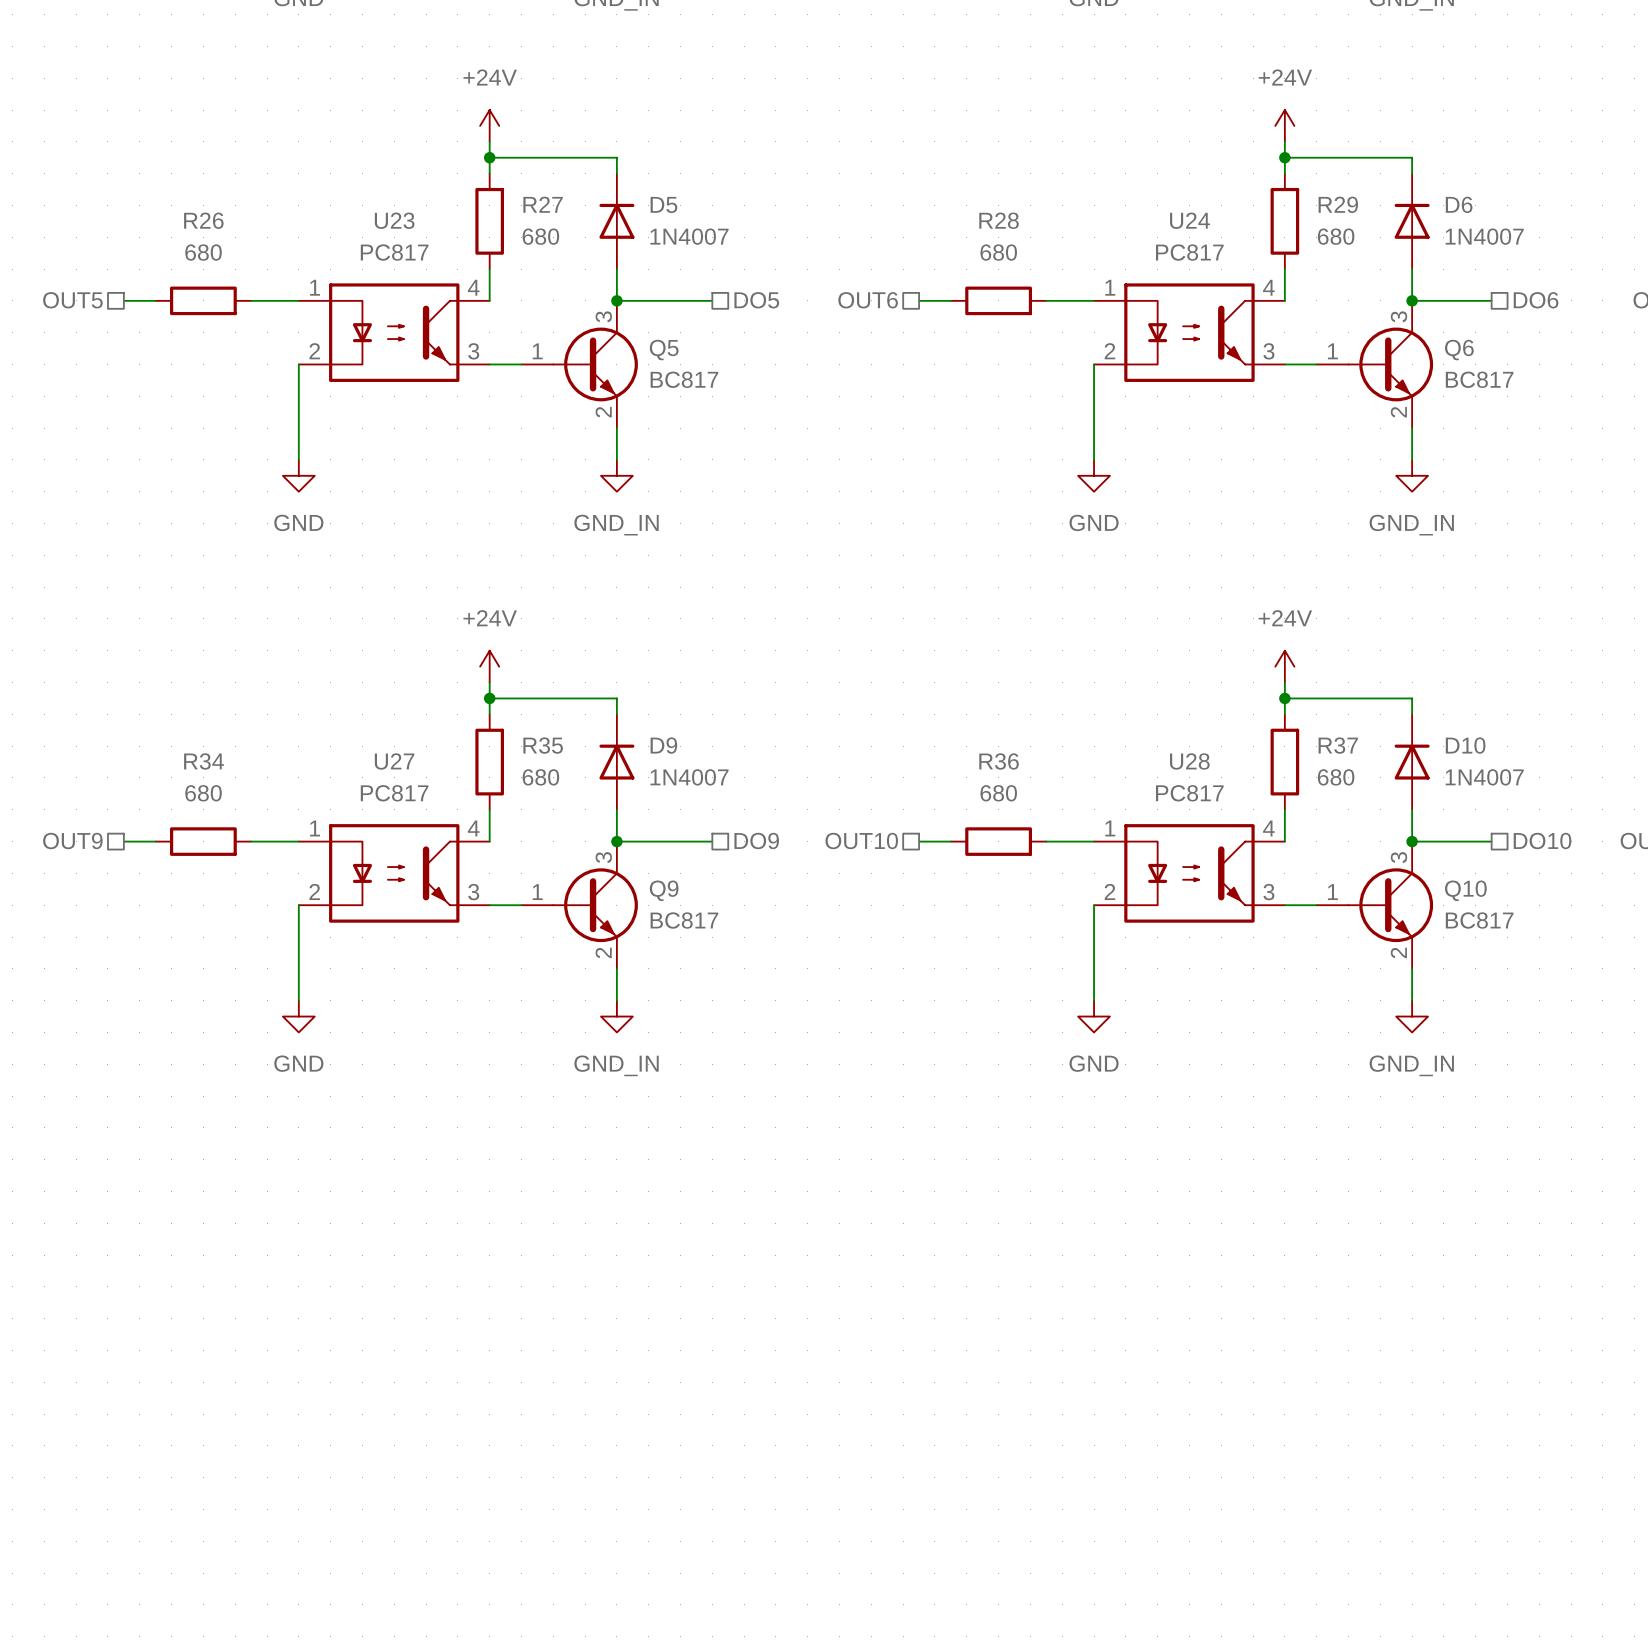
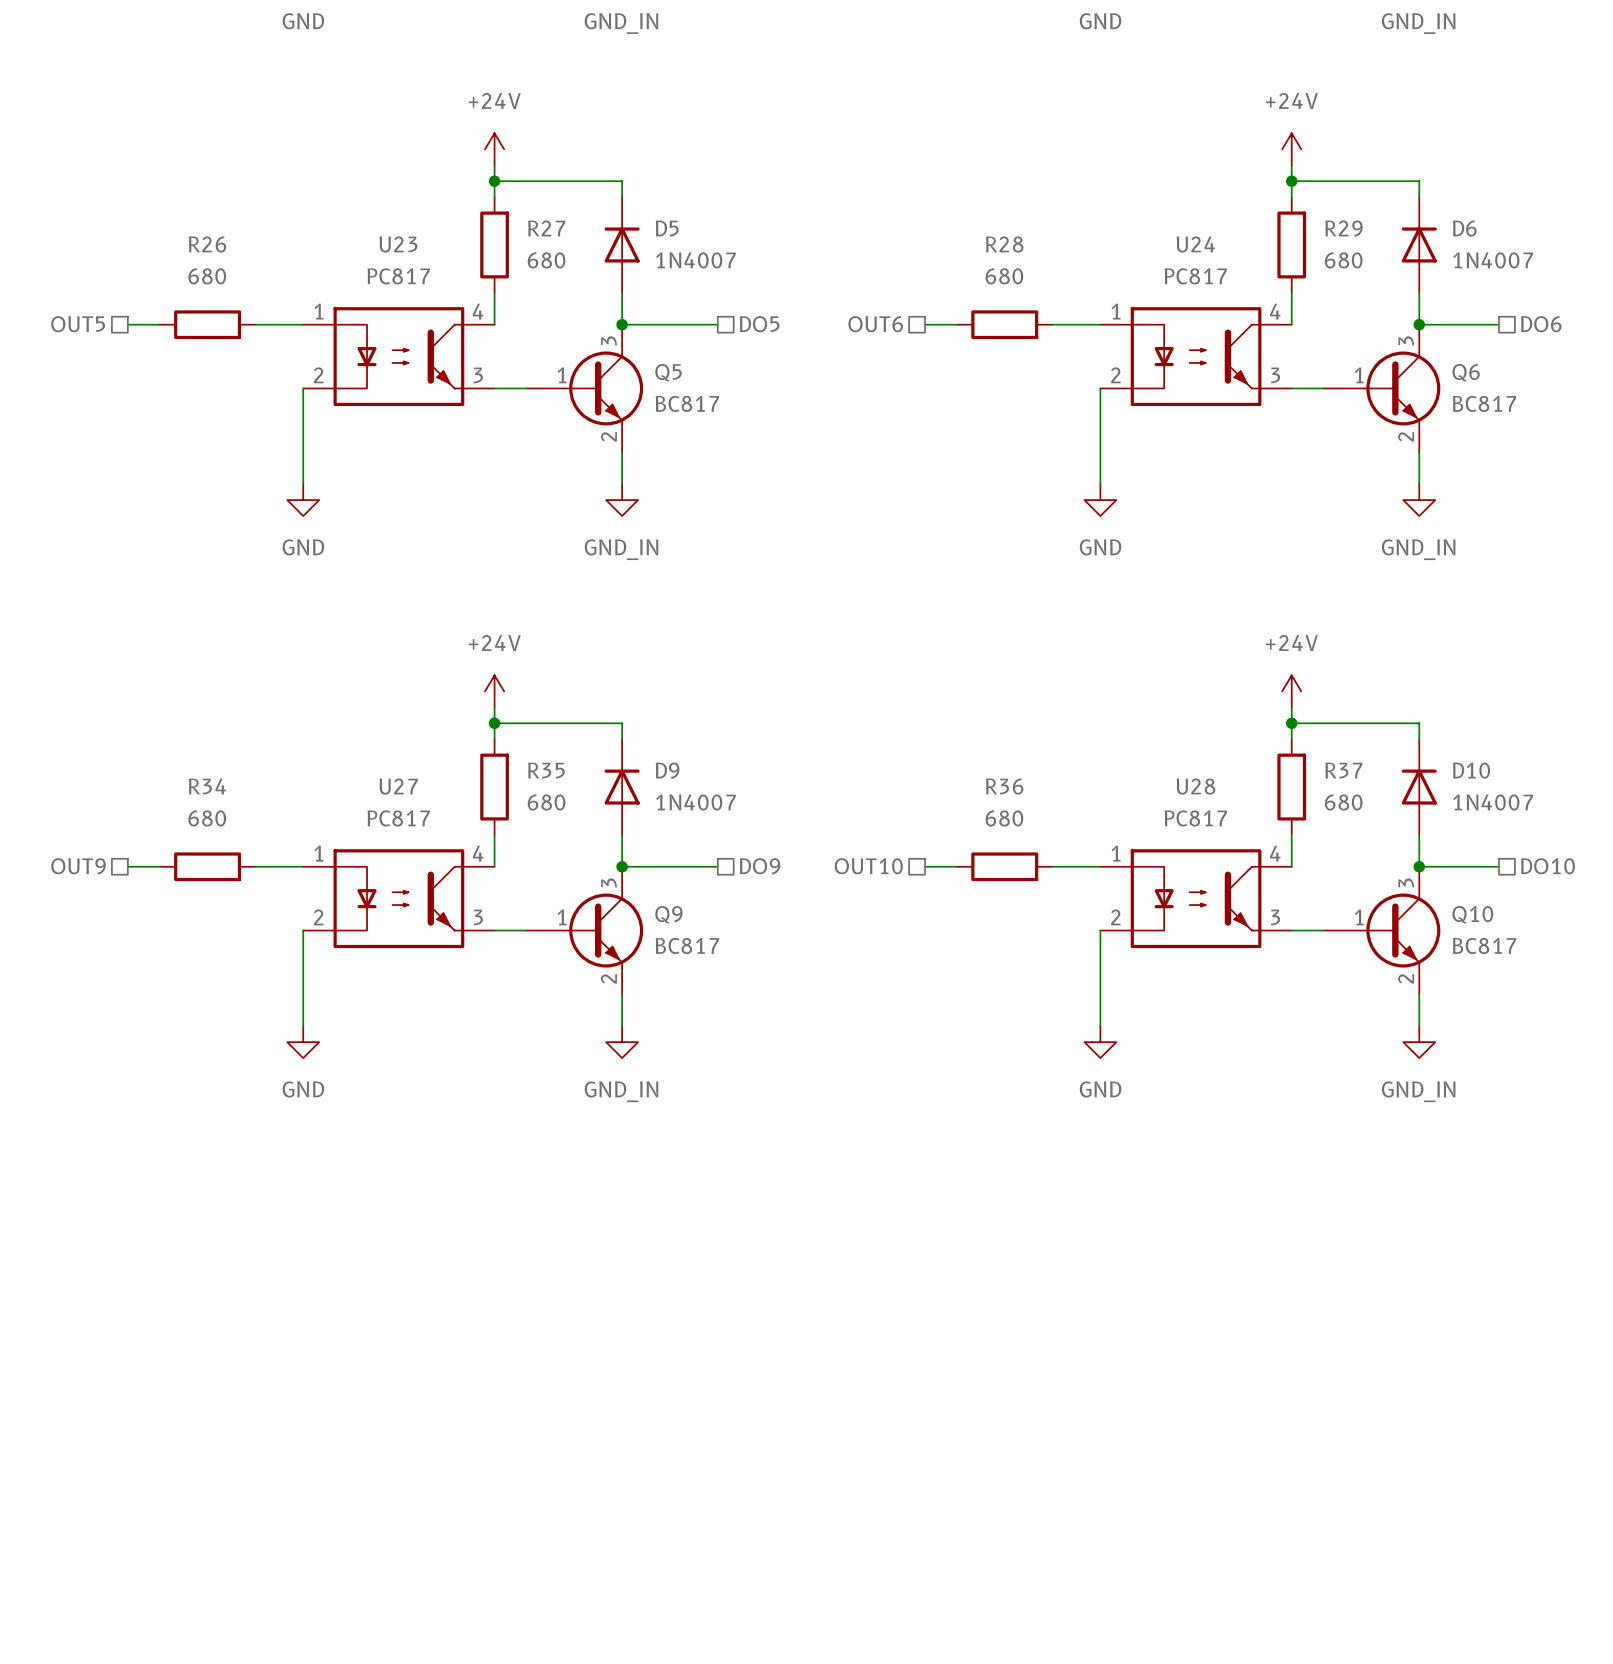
Q5 symbol: [521, 300, 638, 429] -> [526, 324, 644, 453]
Q6 symbol: [1316, 300, 1434, 429] -> [1323, 324, 1441, 453]
Q9 symbol: [521, 841, 638, 969] -> [526, 866, 644, 995]
Q10 symbol: [1316, 841, 1434, 969] -> [1323, 866, 1441, 995]

